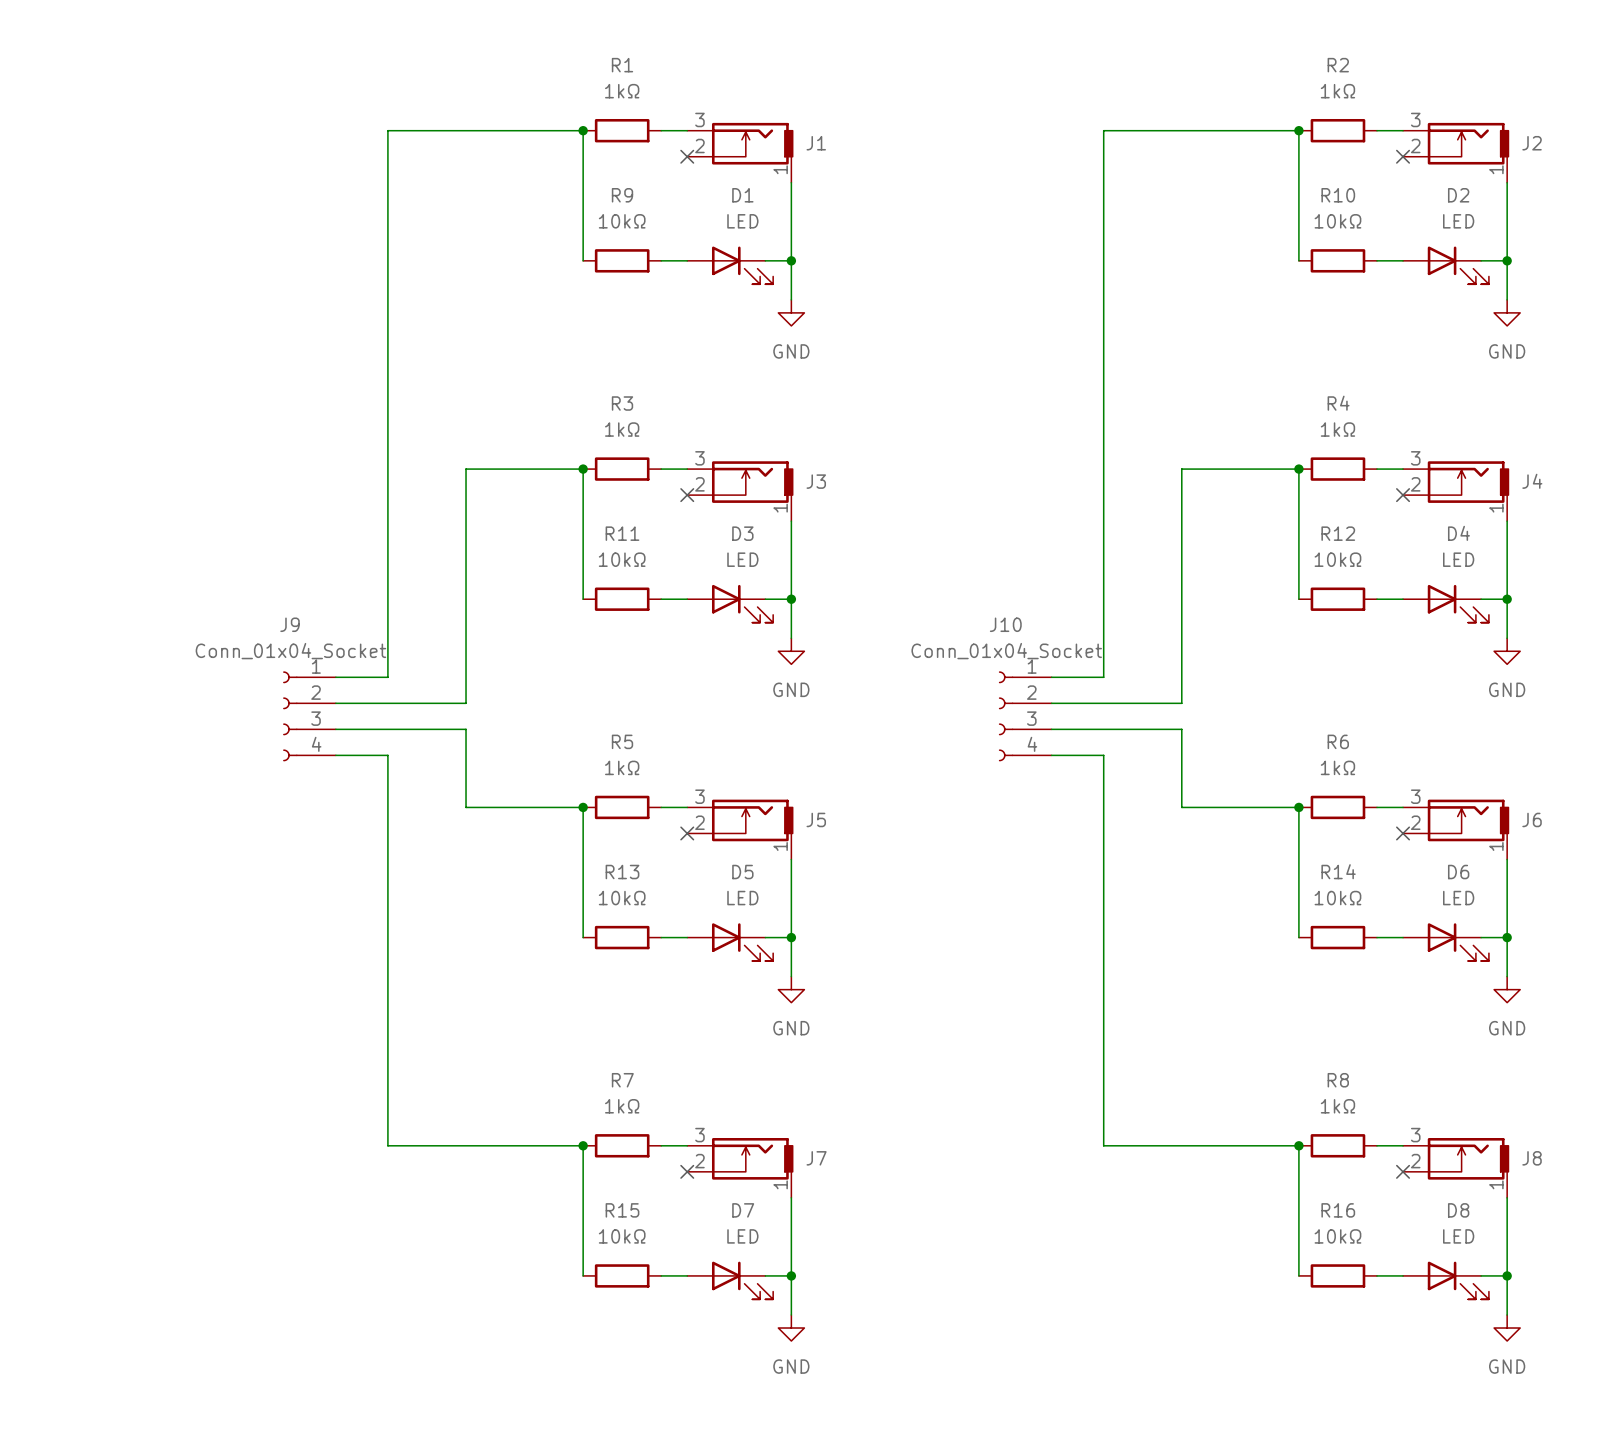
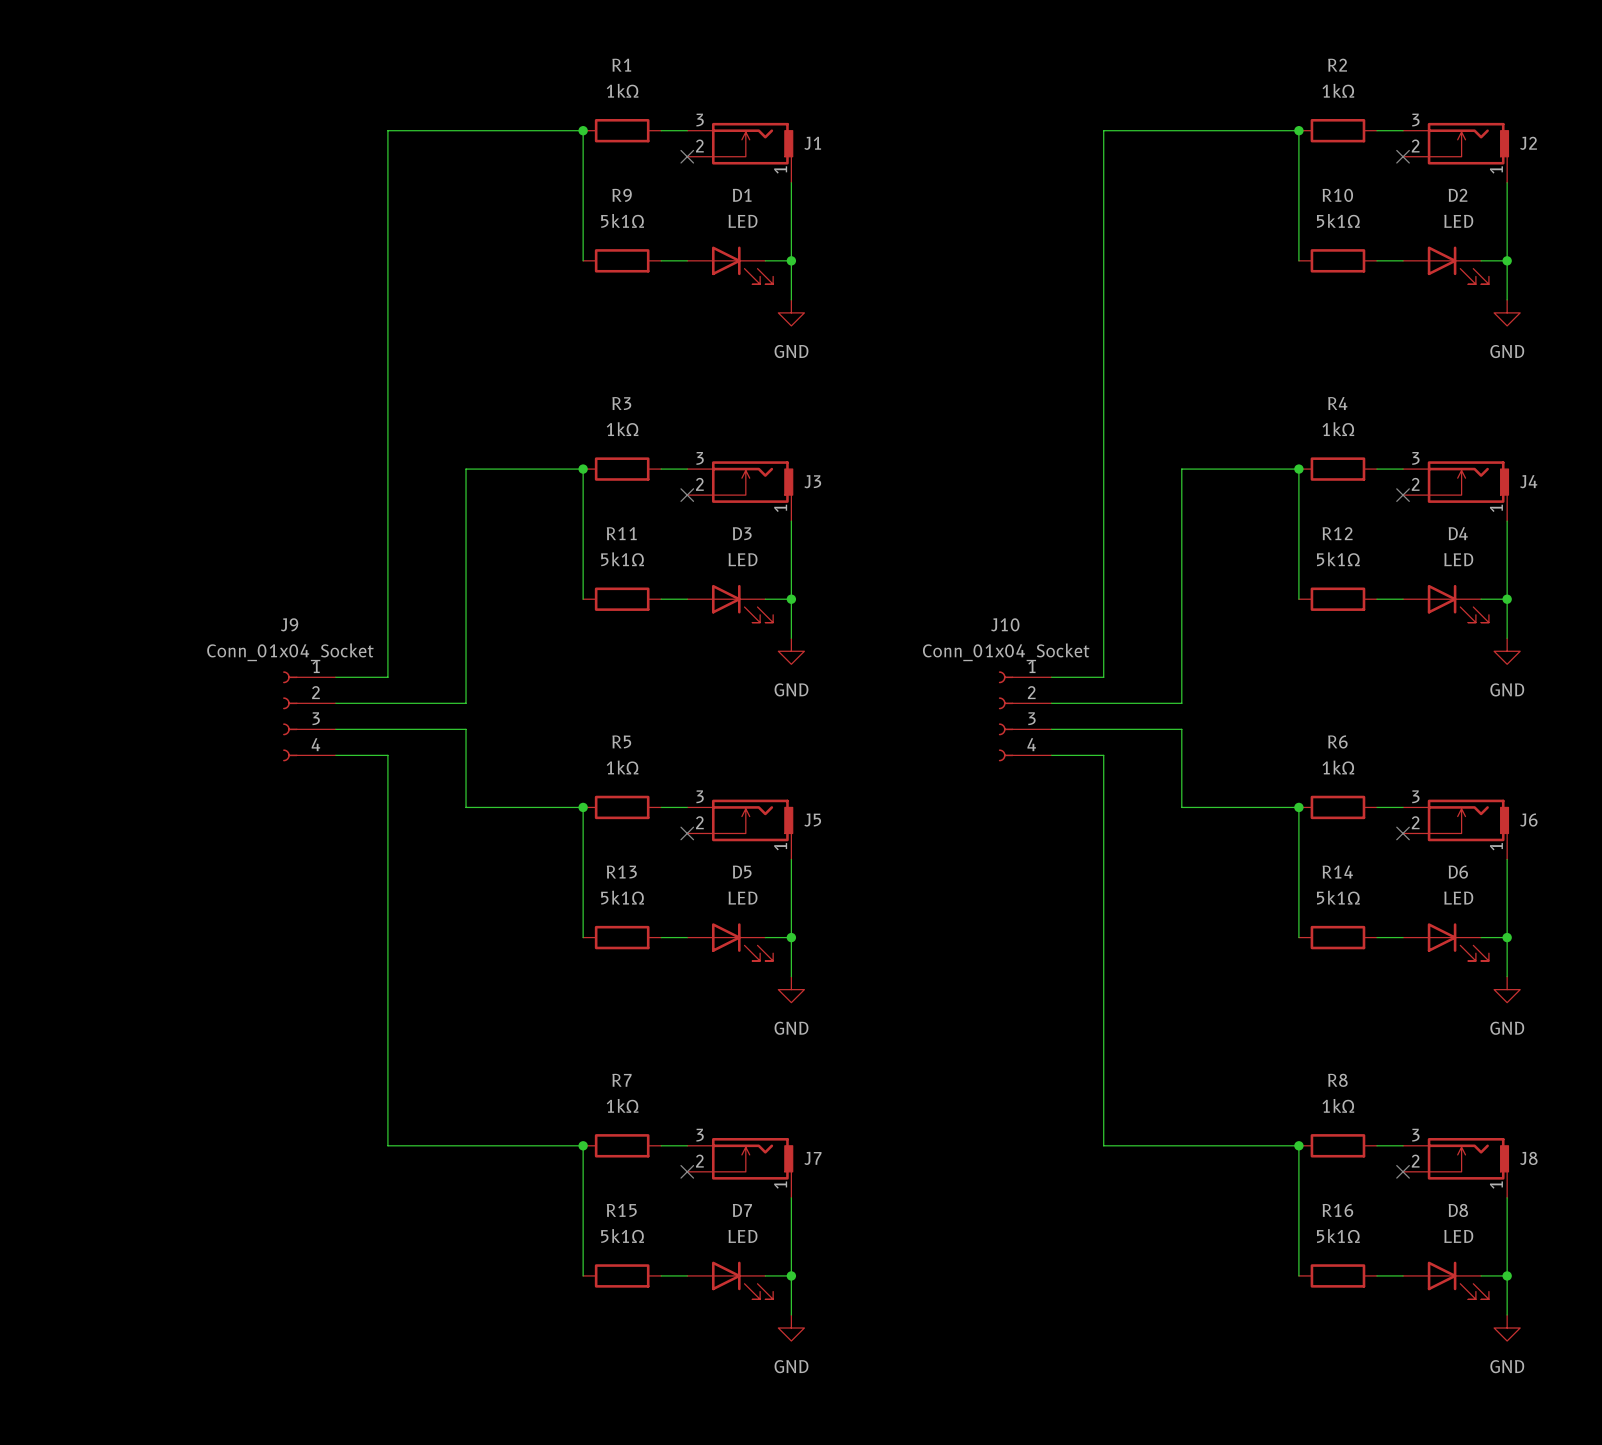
R9 value: 10kΩ (622, 221) -> 5k1Ω (622, 220)
R10 value: 10kΩ (1337, 221) -> 5k1Ω (1338, 220)
R11 value: 10kΩ (622, 559) -> 5k1Ω (622, 559)
R12 value: 10kΩ (1337, 559) -> 5k1Ω (1338, 559)
R13 value: 10kΩ (622, 898) -> 5k1Ω (622, 897)
R14 value: 10kΩ (1337, 898) -> 5k1Ω (1338, 897)
R15 value: 10kΩ (622, 1236) -> 5k1Ω (622, 1235)
R16 value: 10kΩ (1337, 1236) -> 5k1Ω (1338, 1235)

